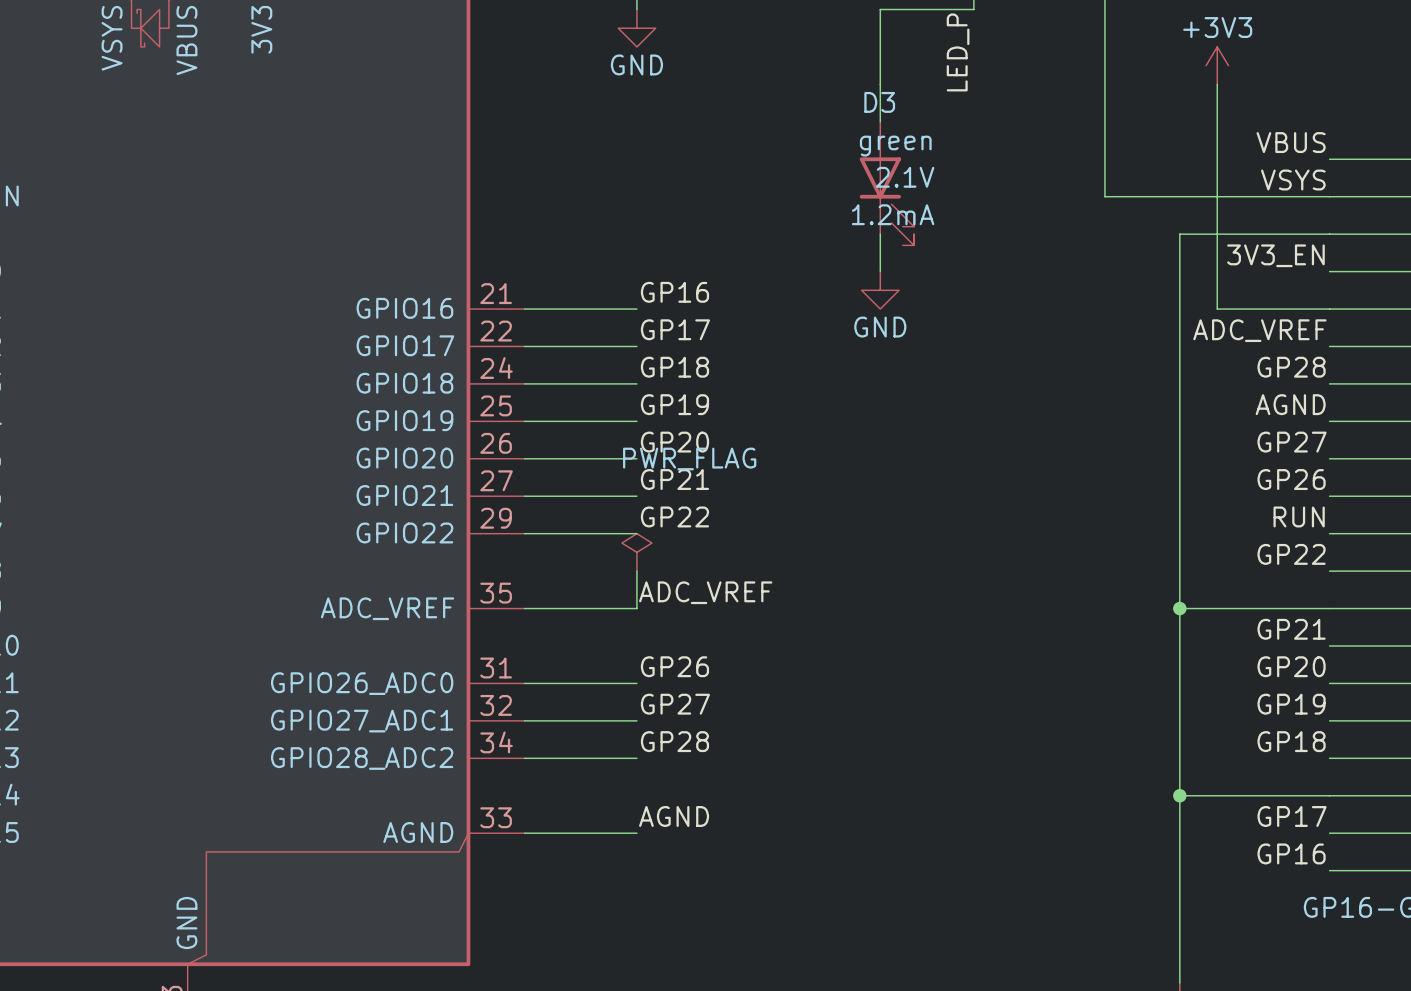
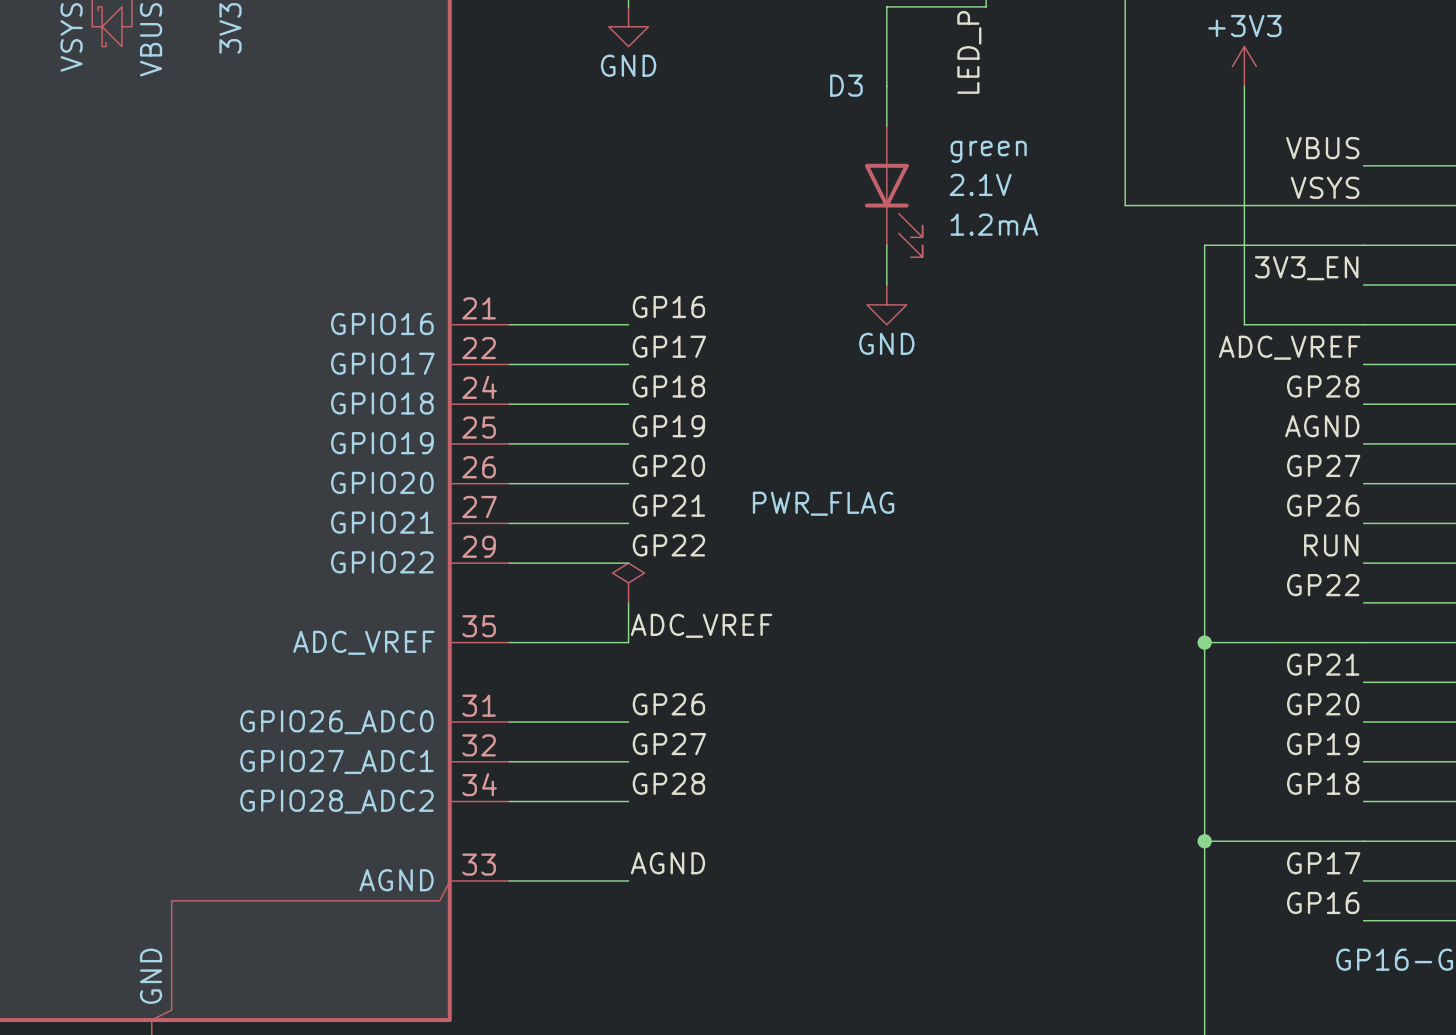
D3 name position: D3 (879, 102) -> D3 (846, 85)
D3 value position: green (895, 146) -> green (988, 151)
D3 text position: 2.1V (905, 177) -> 2.1V (980, 184)
D3 text position: 1.2mA (893, 214) -> 1.2mA (994, 224)
power symbol text position: PWR_FLAG (689, 458) -> PWR_FLAG (823, 503)

